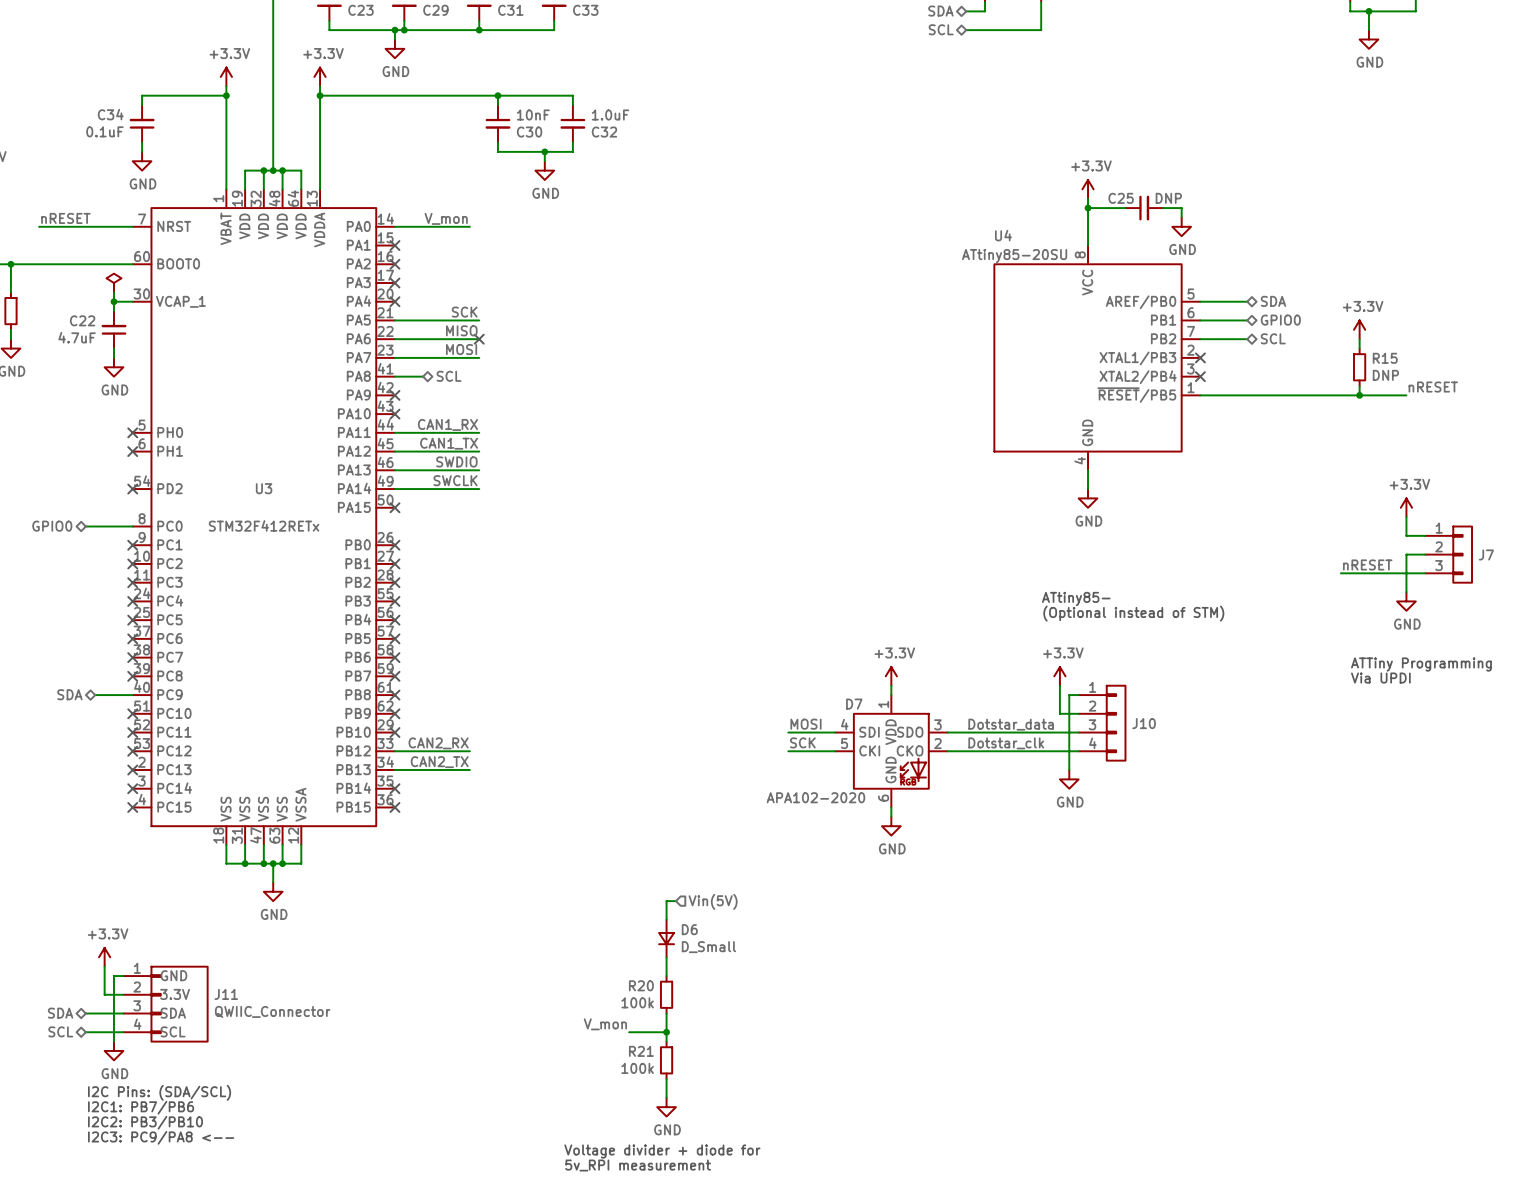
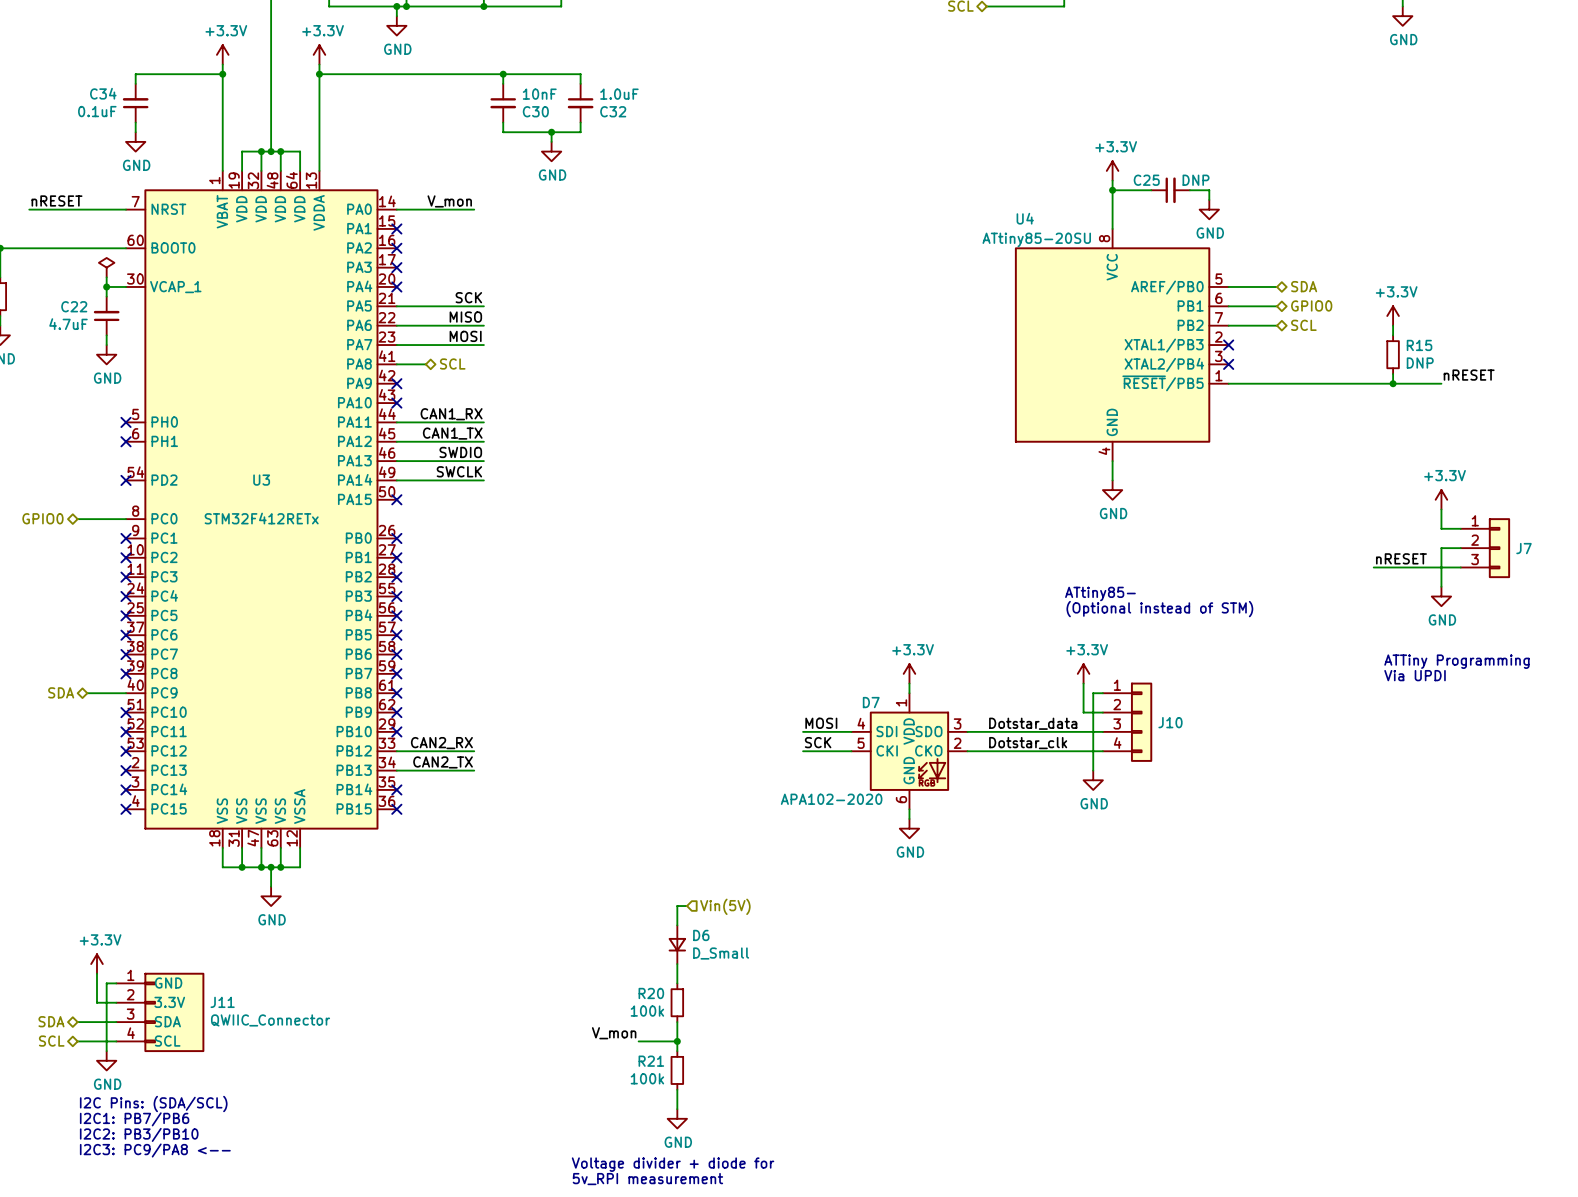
no-connect mark: (479, 339) -> none

